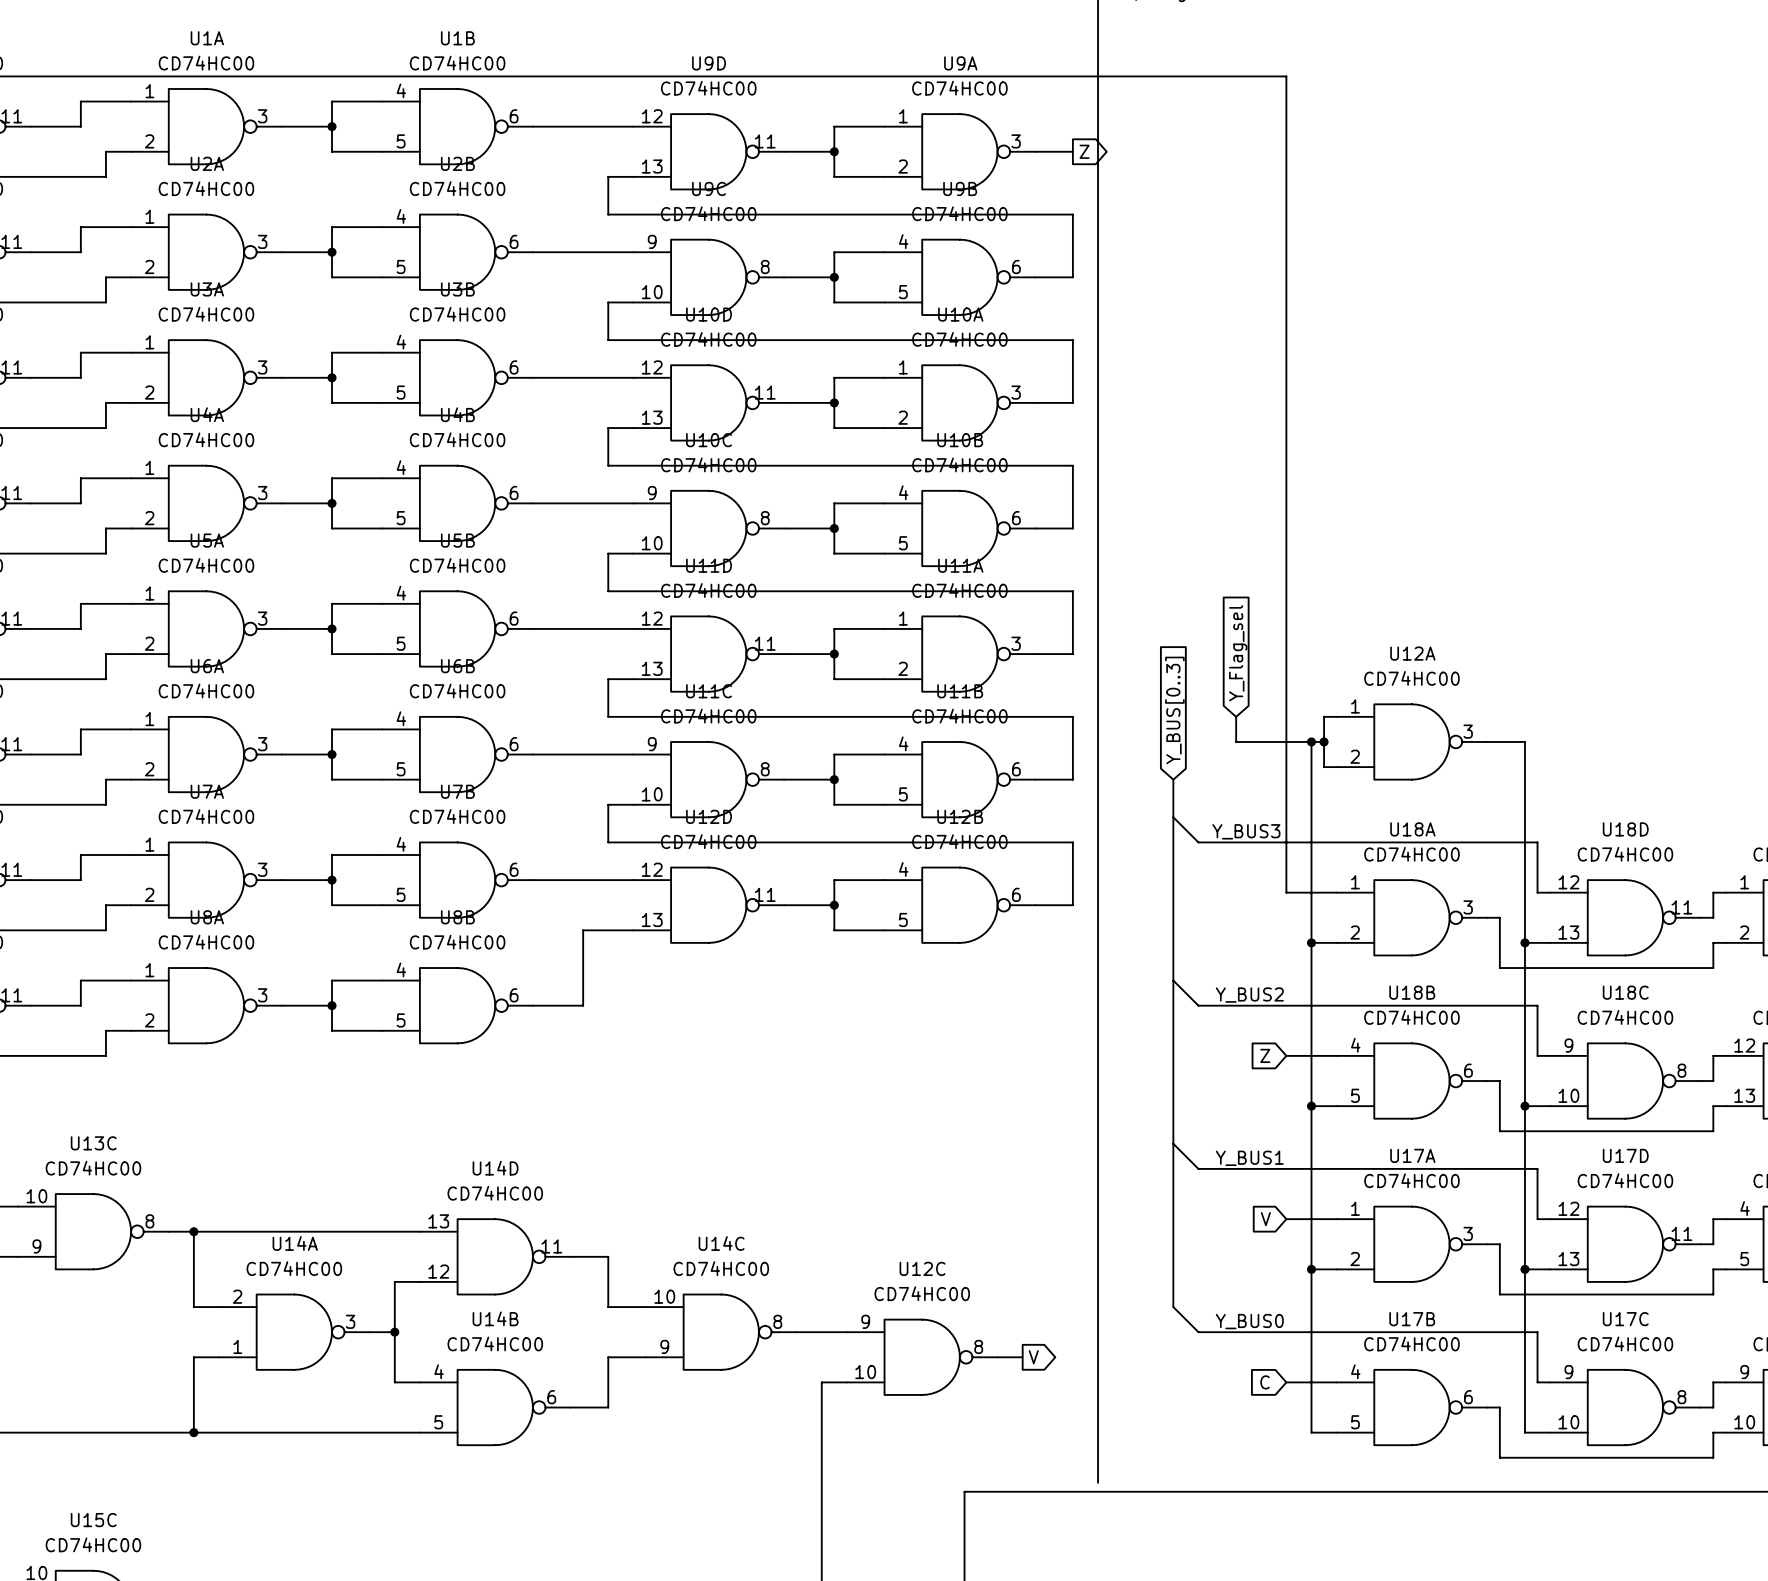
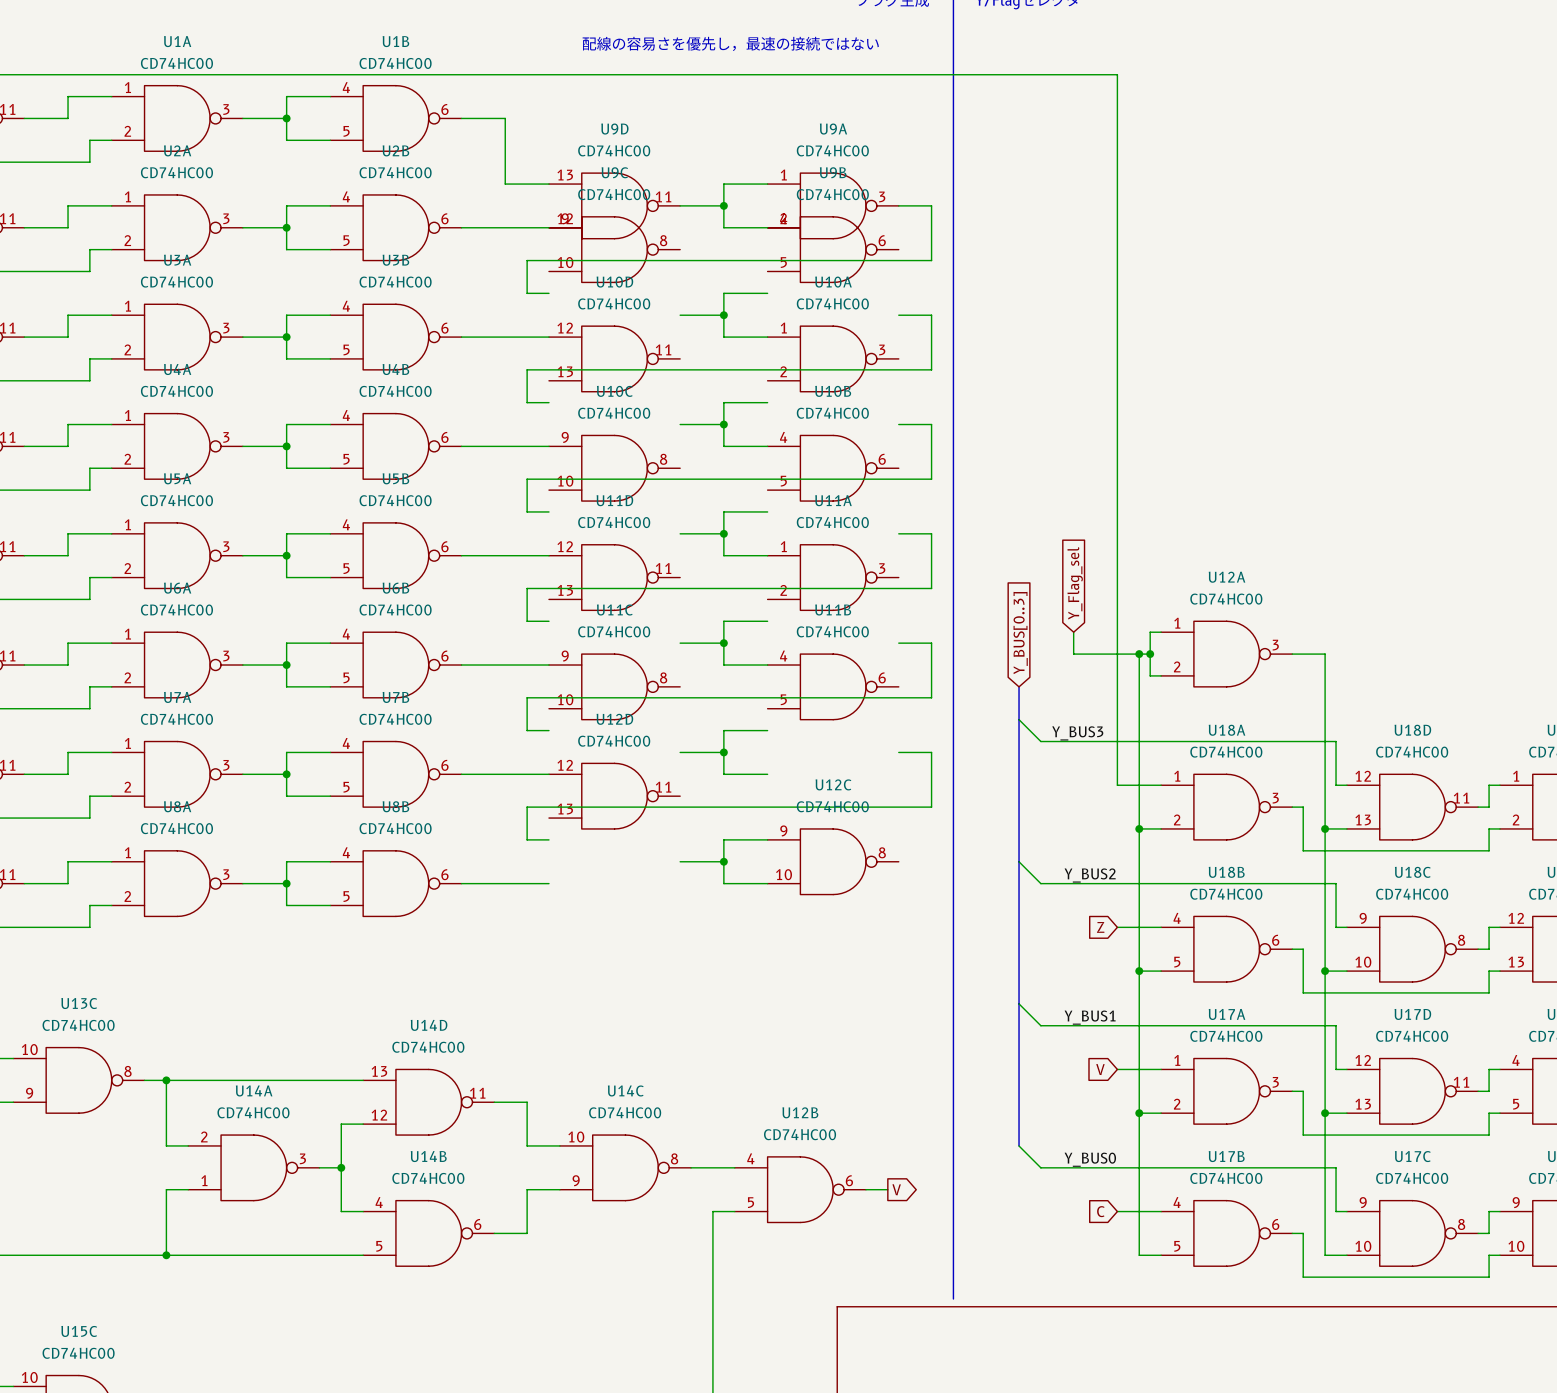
text: none -> 配線の容易さを優先し，最速の接続ではない (730, 43)
wire: (583, 126) (633, 126) -> (505, 118) (505, 184) (548, 184)
wire: (884, 126) (834, 126) (834, 176) (884, 176) -> none
U9D flip: as is (708, 151) -> up-down (614, 205)
wire: (784, 151) (834, 151) -> (680, 205) (723, 205)
junction: (834, 151) -> none
U9A position: (959, 151) -> (833, 205)
wire: (1035, 151) (1072, 151) -> none
global label: Z (1084, 151) -> none
wire: (633, 176) (608, 176) (608, 214) (1072, 214) (1072, 227) -> (898, 205) (931, 205)
junction: none -> (723, 205)
wire: (834, 252) (834, 302) (884, 302) -> (723, 227) (723, 184) (767, 184)
wire: (784, 277) (834, 277) -> (680, 315) (723, 315)
junction: (834, 277) -> none
wire: (1035, 277) (1072, 277) -> (527, 271) (527, 260) (931, 260) (931, 249)
wire: (608, 302) (633, 302) -> (527, 293) (548, 293)
wire: (608, 327) (608, 340) (1072, 340) (1072, 352) -> (898, 315) (931, 315)
junction: none -> (723, 315)
wire: (834, 377) (834, 428) (884, 428) -> (723, 337) (723, 293) (767, 293)
wire: (784, 402) (834, 402) -> (680, 424) (723, 424)
junction: (834, 402) -> none
wire: (1035, 402) (1072, 402) -> (527, 380) (527, 369) (931, 369) (931, 358)
wire: (608, 428) (633, 428) -> (527, 402) (548, 402)
wire: (608, 453) (608, 465) (1072, 465) (1072, 478) -> (898, 424) (931, 424)
junction: none -> (723, 424)
wire: (834, 503) (834, 553) (884, 553) -> (723, 446) (723, 402) (767, 402)
wire: (784, 528) (834, 528) -> (680, 533) (723, 533)
junction: (834, 528) -> none
wire: (1035, 528) (1072, 528) -> (527, 490) (527, 479) (931, 479) (931, 468)
wire: (608, 553) (633, 553) -> (527, 511) (548, 511)
wire: (608, 578) (608, 591) (1072, 591) (1072, 603) -> (898, 533) (931, 533)
junction: none -> (723, 533)
wire: (834, 628) (834, 679) (884, 679) -> (723, 555) (723, 511) (767, 511)
wire: (784, 654) (834, 654) -> (680, 643) (723, 643)
junction: (834, 654) -> none
wire: (1035, 654) (1072, 654) -> (527, 599) (527, 588) (931, 588) (931, 577)
wire: (608, 679) (633, 679) -> (527, 621) (548, 621)
wire: (608, 704) (608, 716) (1072, 716) (1072, 729) -> (898, 643) (931, 643)
junction: none -> (723, 643)
wire: (834, 754) (834, 804) (884, 804) -> (723, 665) (723, 621) (767, 621)
wire: (784, 779) (834, 779) -> (680, 752) (723, 752)
junction: (834, 779) -> none
wire: (1035, 779) (1072, 779) -> (527, 708) (527, 697) (931, 697) (931, 686)
wire: (608, 804) (633, 804) -> (527, 730) (548, 730)
wire: (608, 829) (608, 842) (1072, 842) (1072, 854) -> (898, 752) (931, 752)
junction: none -> (723, 752)
wire: (834, 880) (834, 930) (884, 930) -> (723, 774) (723, 730) (767, 730)
wire: (784, 905) (834, 905) -> (680, 861) (723, 861)
junction: (834, 905) -> none
U12B position: (959, 905) -> (800, 1189)
wire: (1035, 905) (1072, 905) -> (548, 839) (527, 839) (527, 807) (931, 807) (931, 796)
wire: (633, 930) (583, 930) (583, 1005) -> (548, 883) (505, 883)
wire: none -> (767, 839) (723, 839) (723, 883) (767, 883)
junction: none -> (723, 861)
U12C position: (922, 1357) -> (833, 861)

